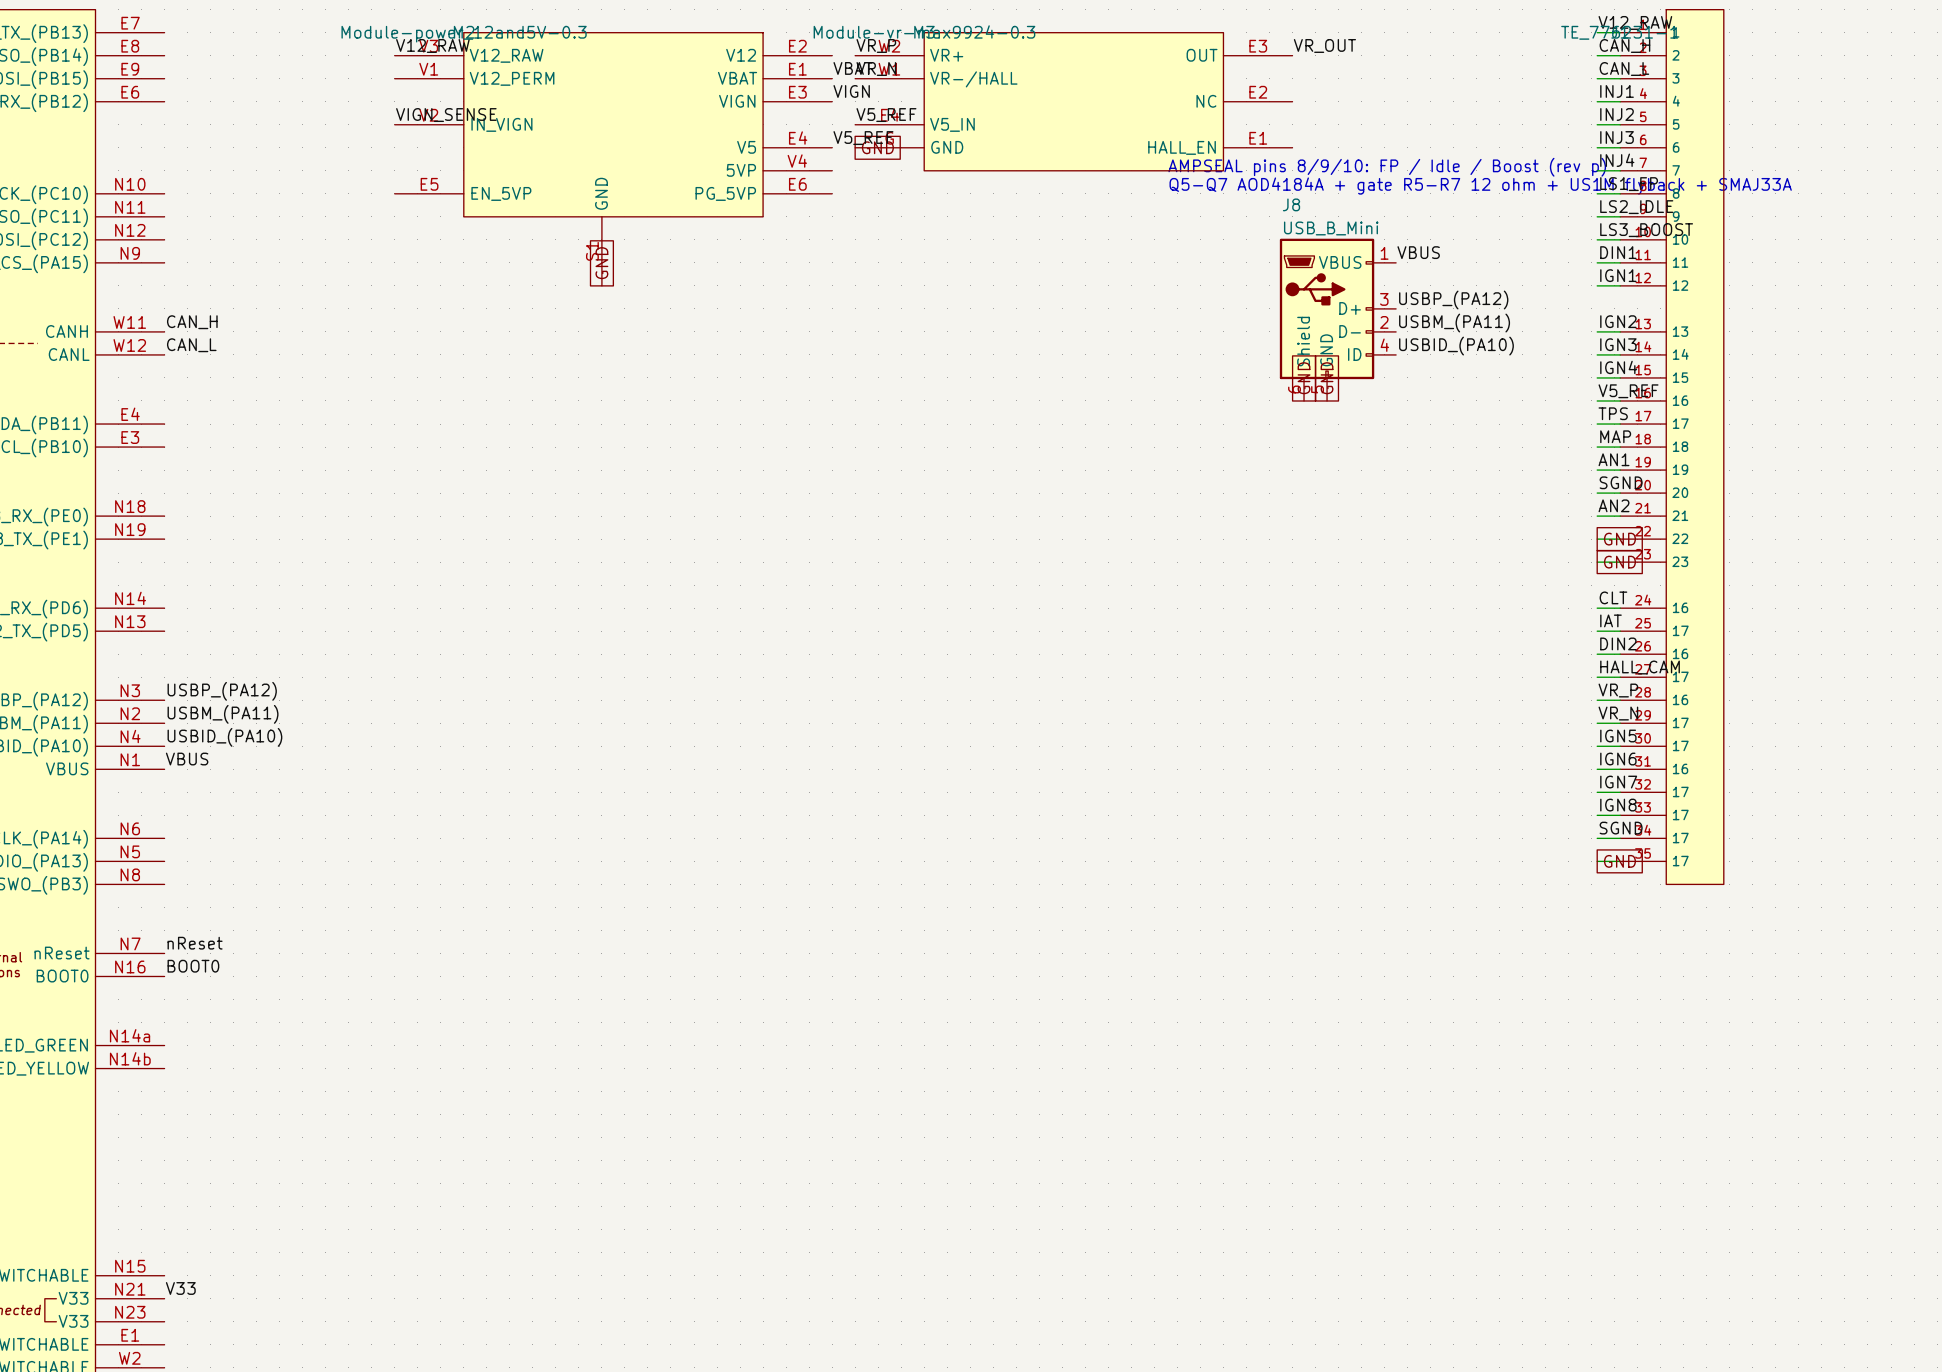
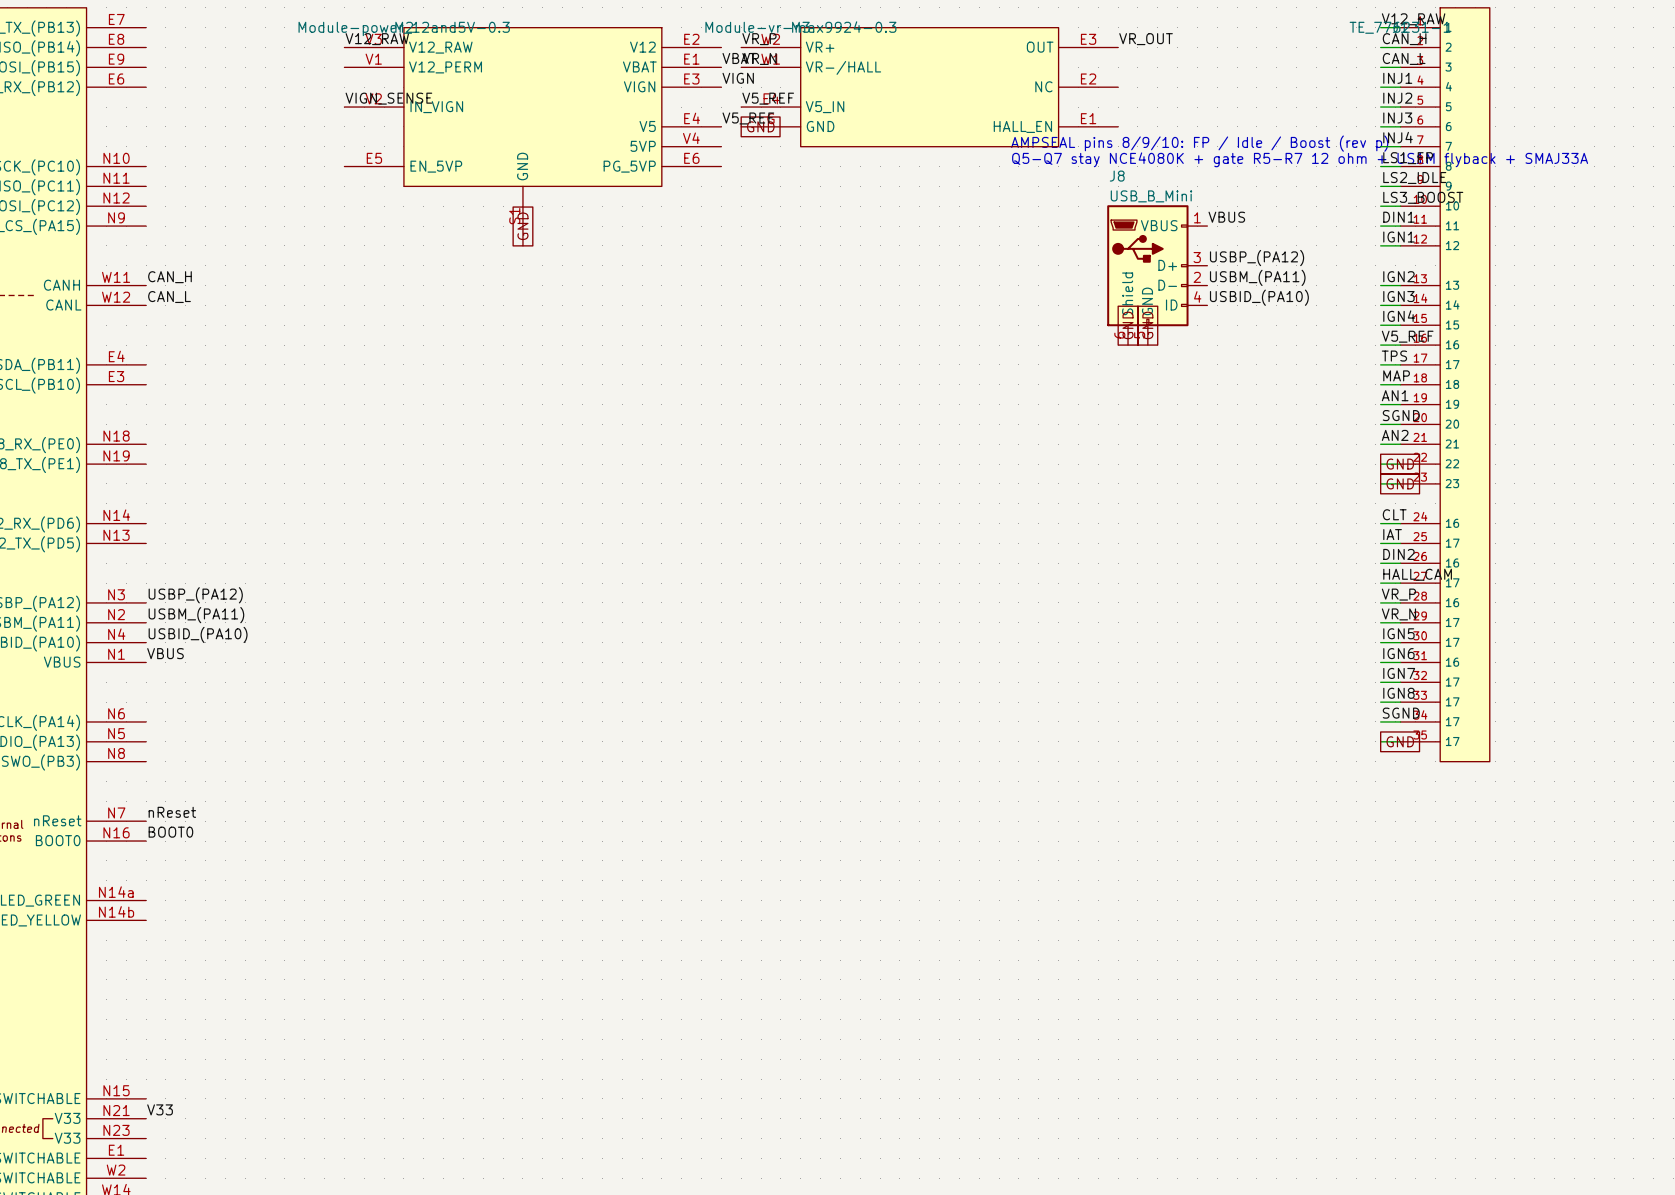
text: Q5-Q7 AOD4184A + gate R5-R7 12 ohm + US1M flyback + SMAJ33A (1480, 186) -> Q5-Q7 stay NCE4080K + gate R5-R7 12 ohm + US1M flyback + SMAJ33A (1300, 159)

